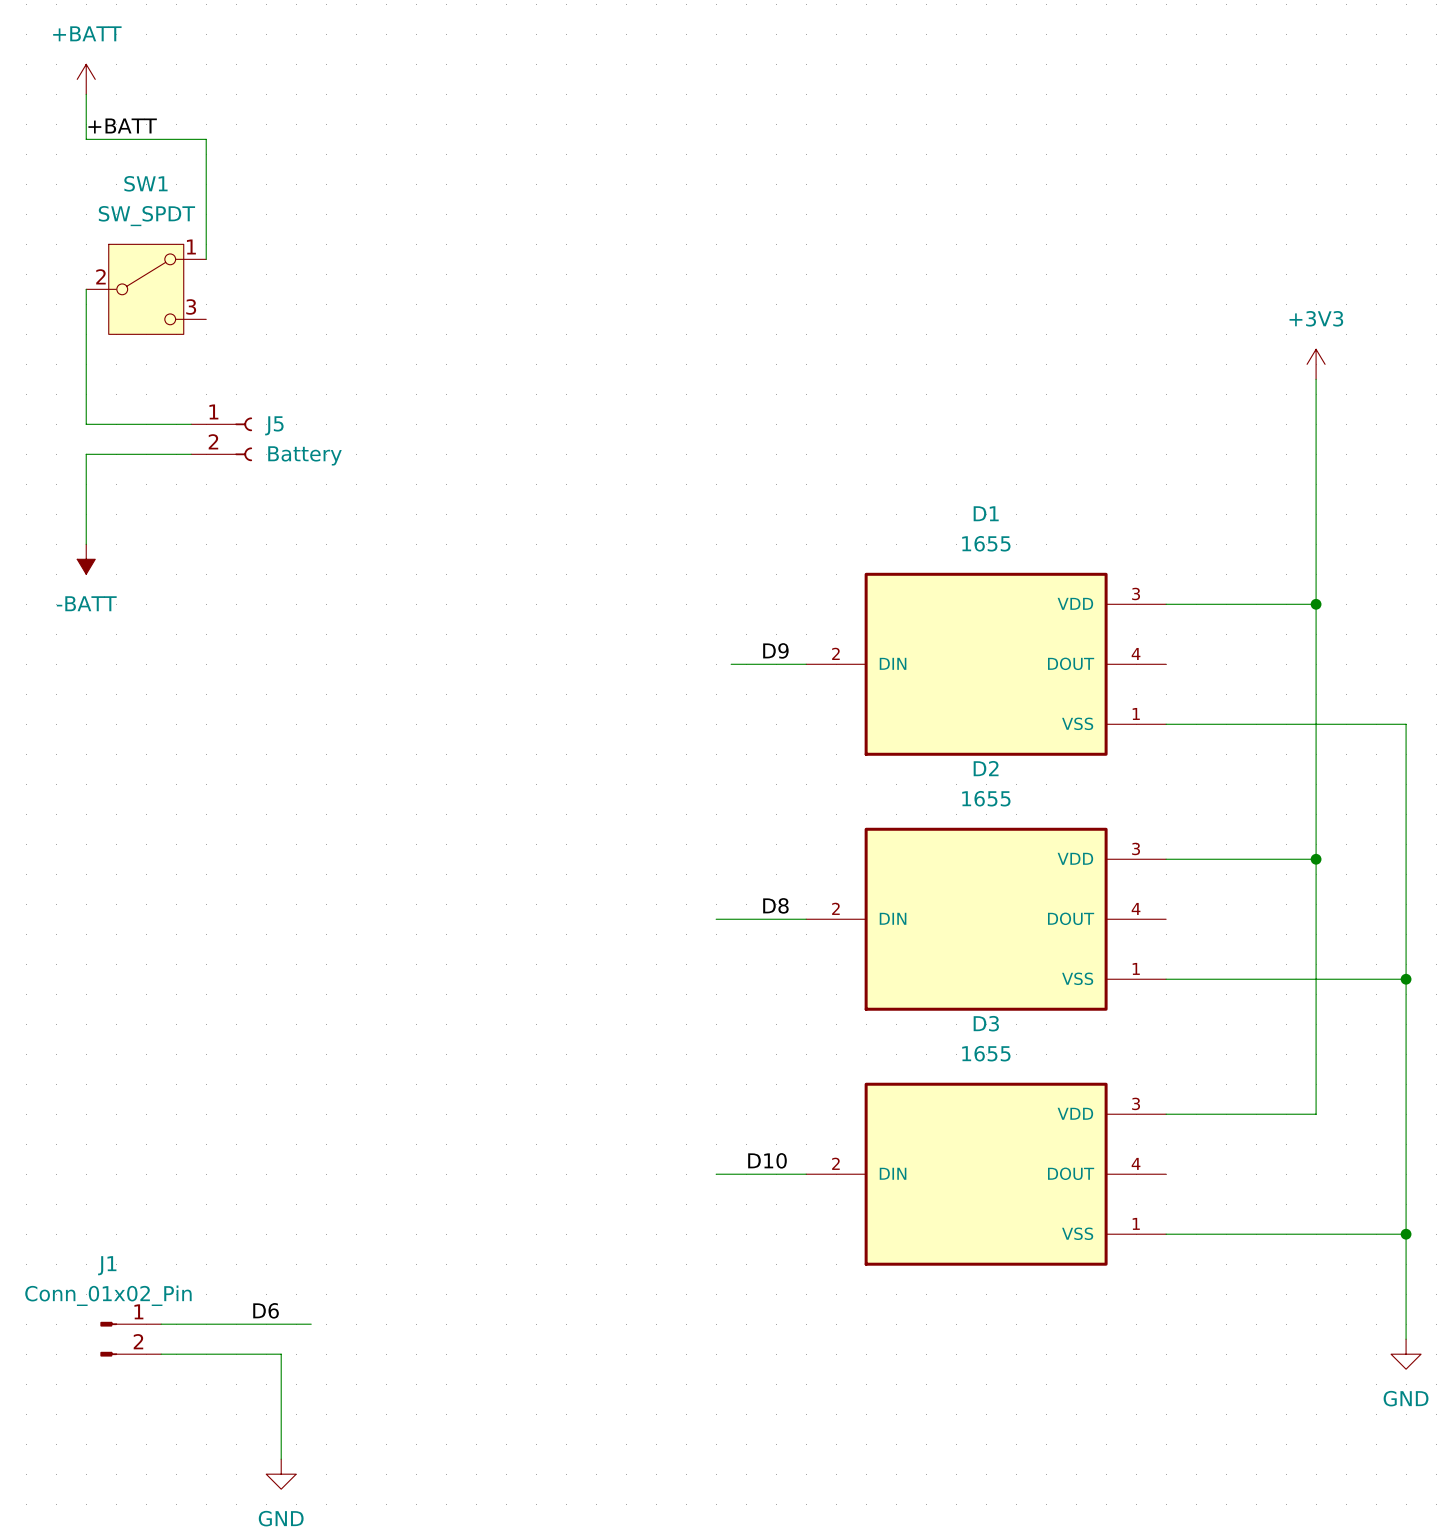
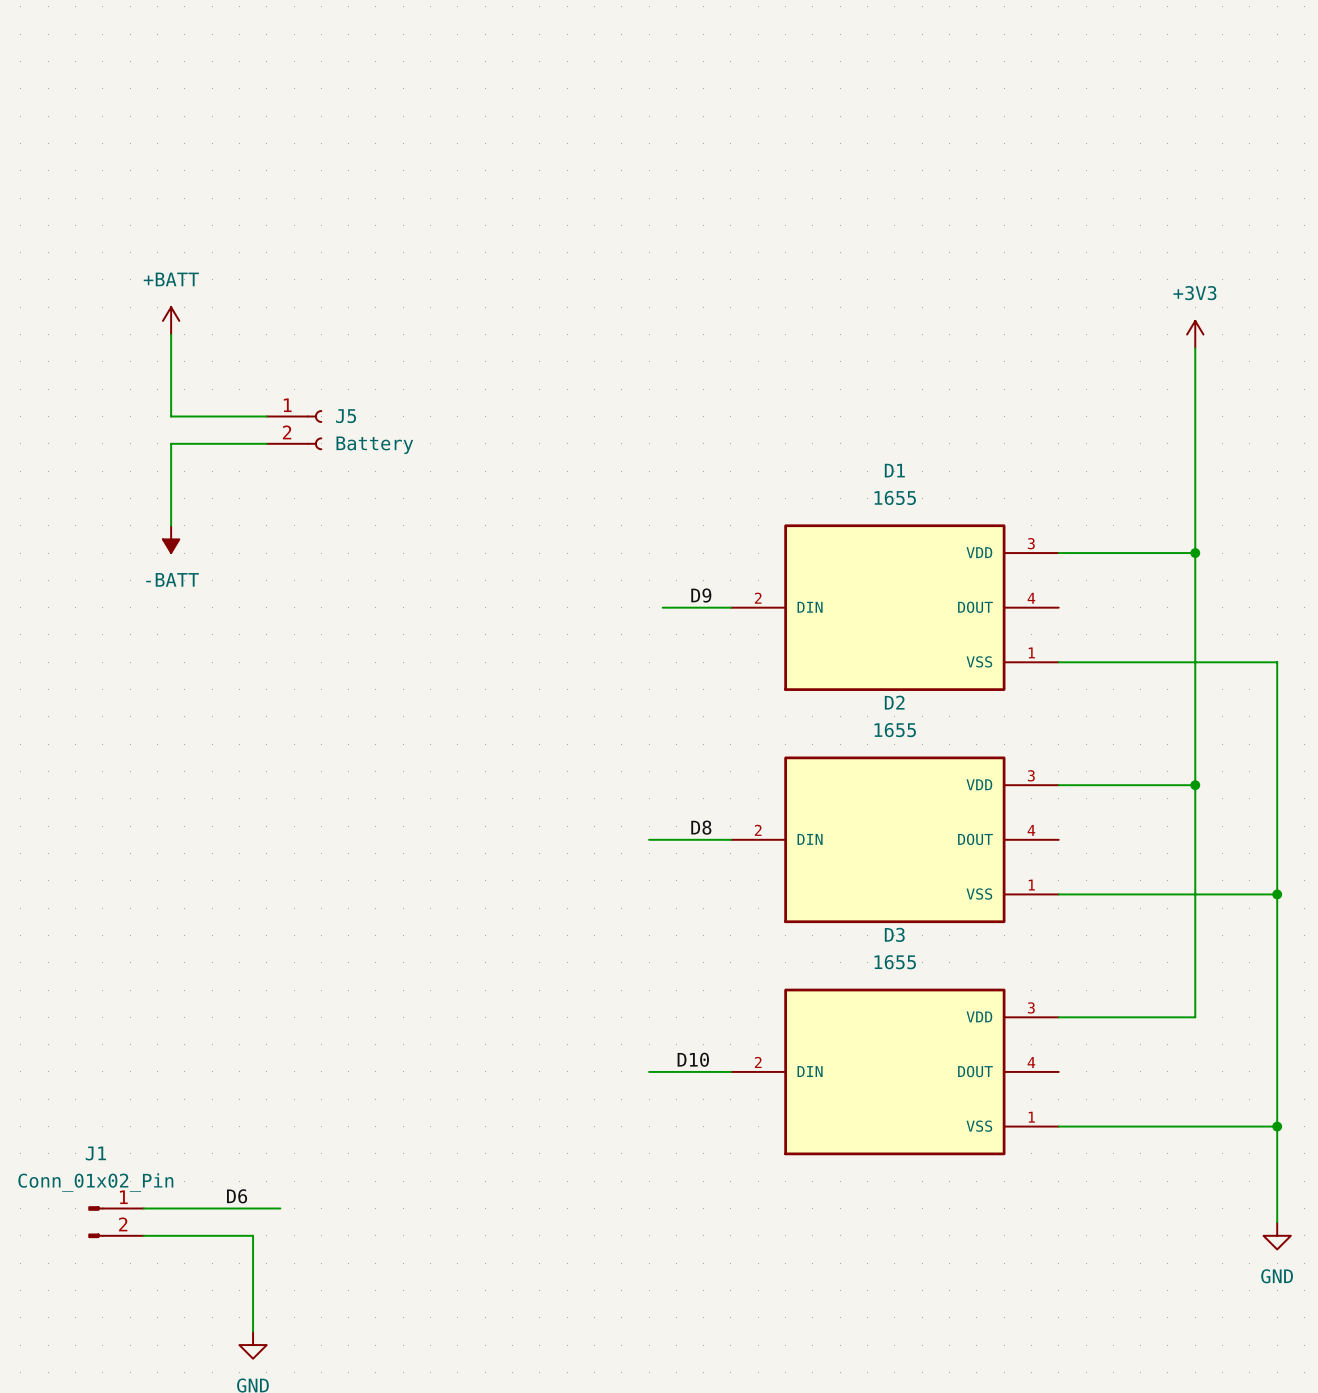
power symbol position: +BATT (86, 79) -> +BATT (171, 320)
wire: (86, 94) (86, 139) (206, 139) (206, 259) -> none
label: +BATT (122, 125) -> none
wire: (86, 289) (86, 424) (191, 424) -> none
SW1: SW_SPDT (146, 289) -> none
wire: none -> (171, 334) (171, 416) (266, 416)
J5 position: (221, 439) -> (294, 430)
wire: (191, 454) (86, 454) (86, 544) -> (266, 443) (171, 443) (171, 525)
power symbol position: -BATT (86, 559) -> -BATT (171, 539)

